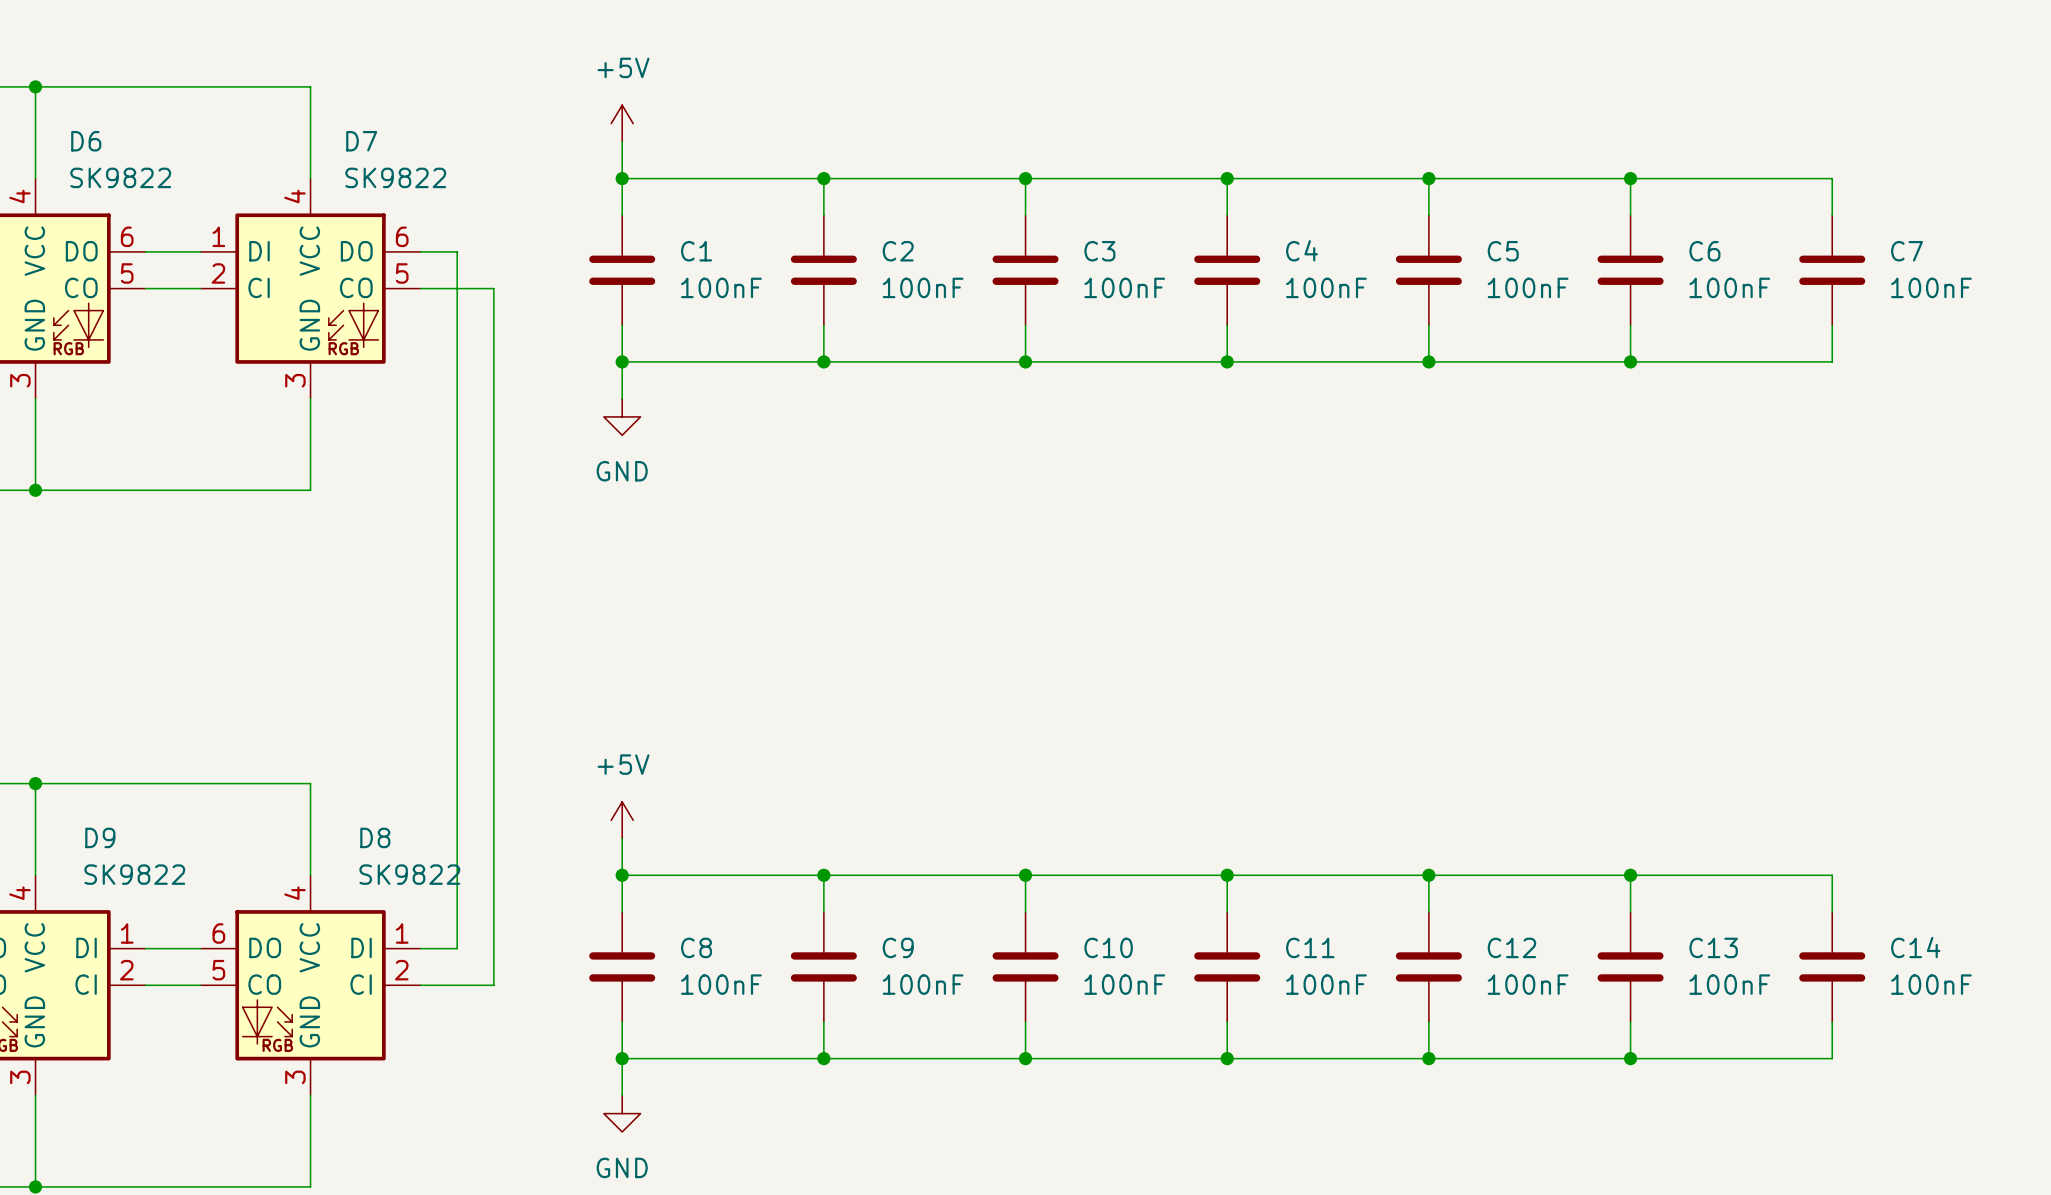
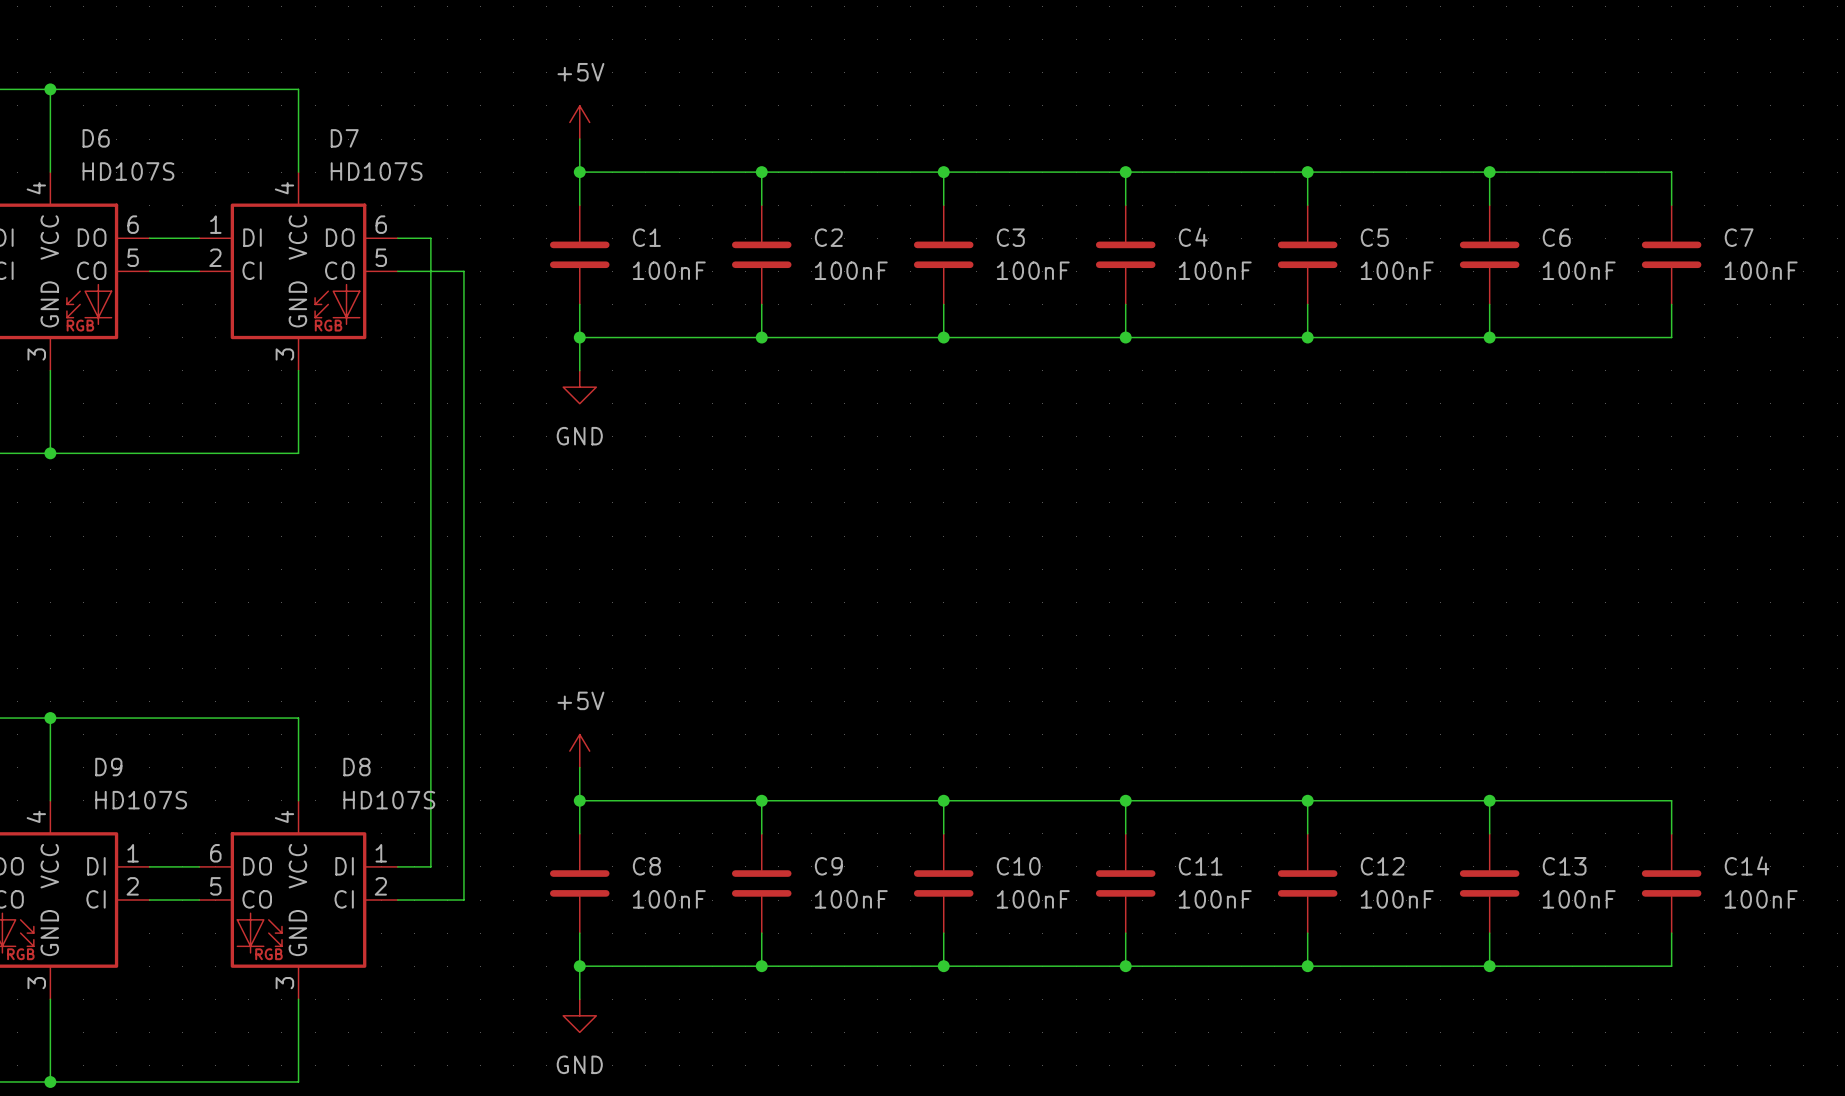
D6 value: SK9822 (120, 177) -> HD107S (128, 171)
D7 value: SK9822 (395, 177) -> HD107S (376, 171)
D9 value: SK9822 (134, 874) -> HD107S (141, 800)
D8 value: SK9822 (409, 874) -> HD107S (389, 800)

